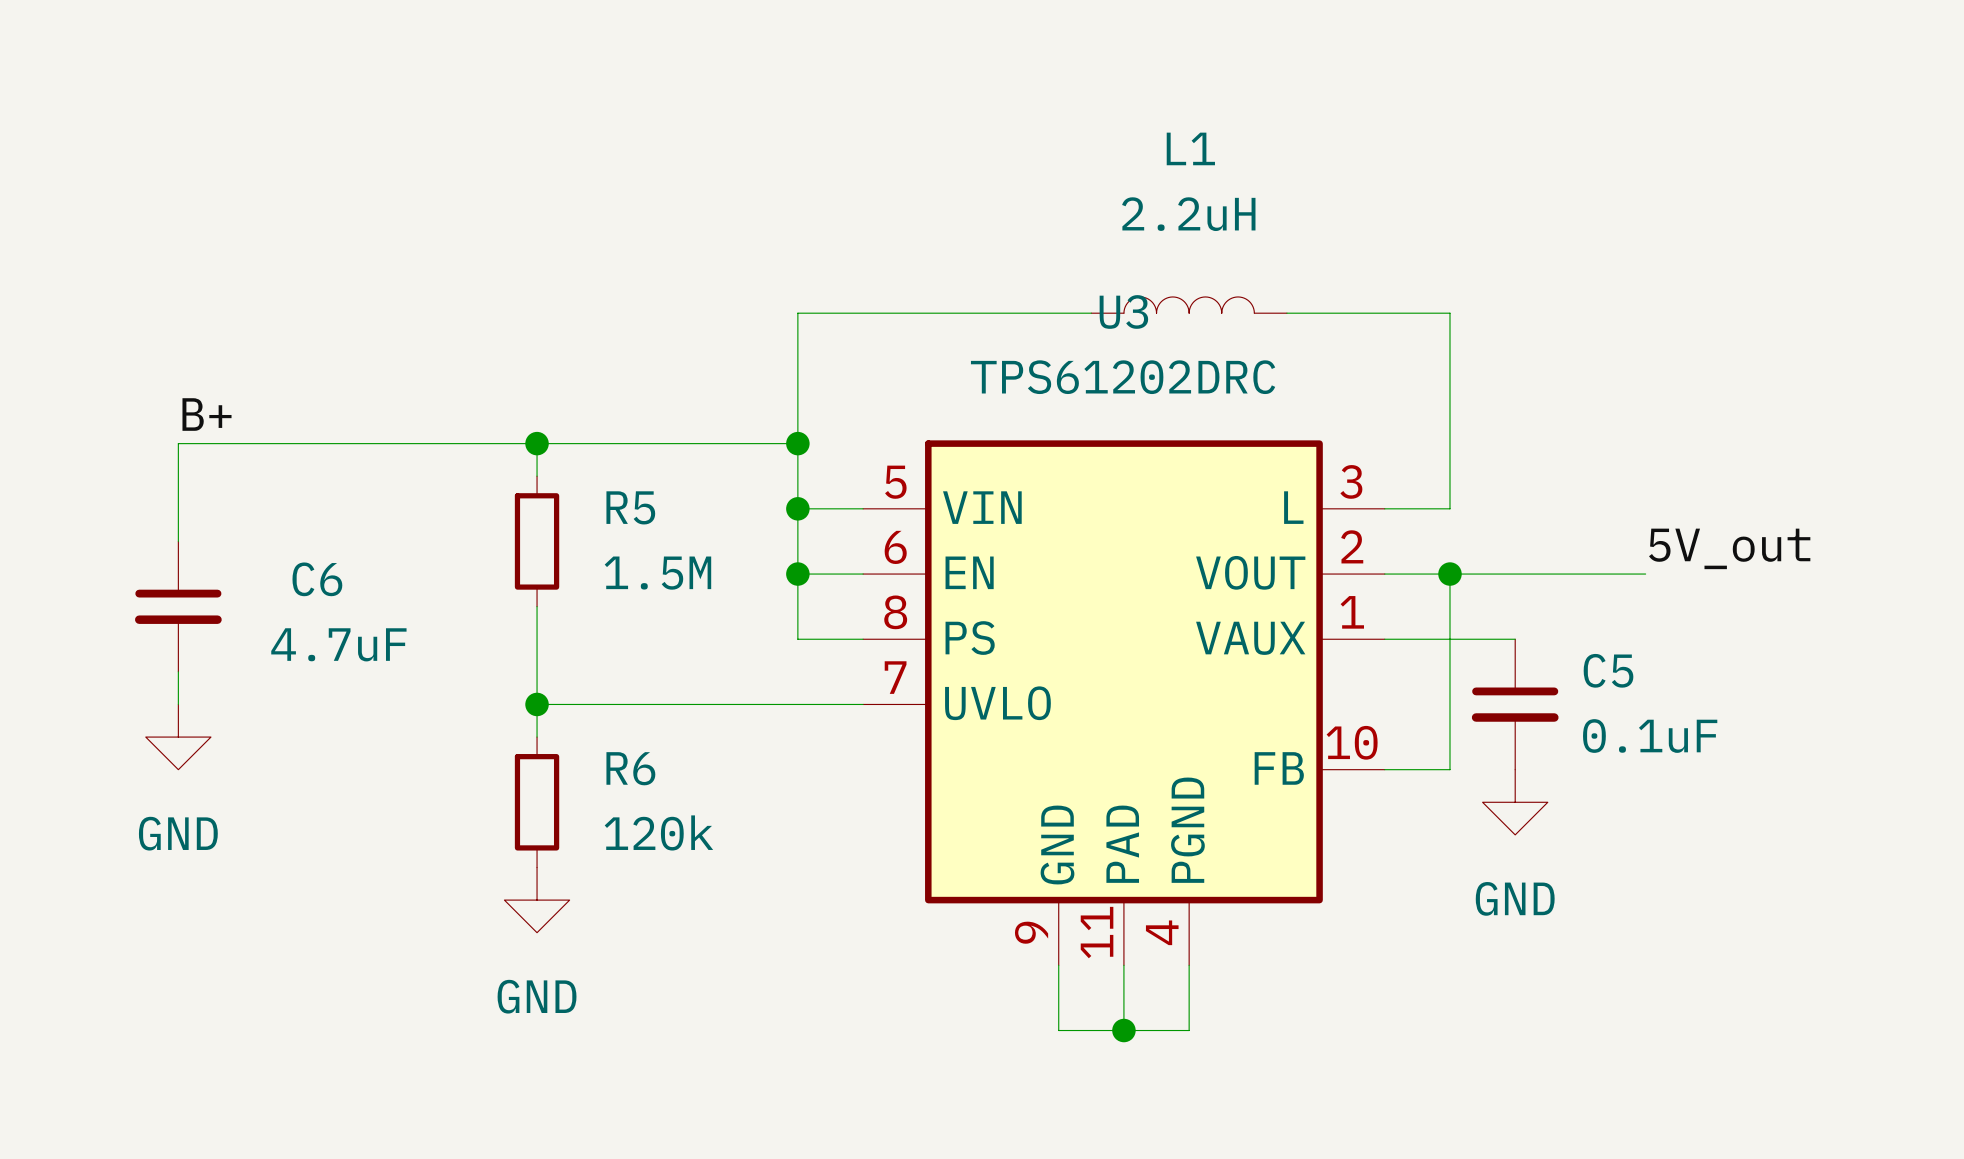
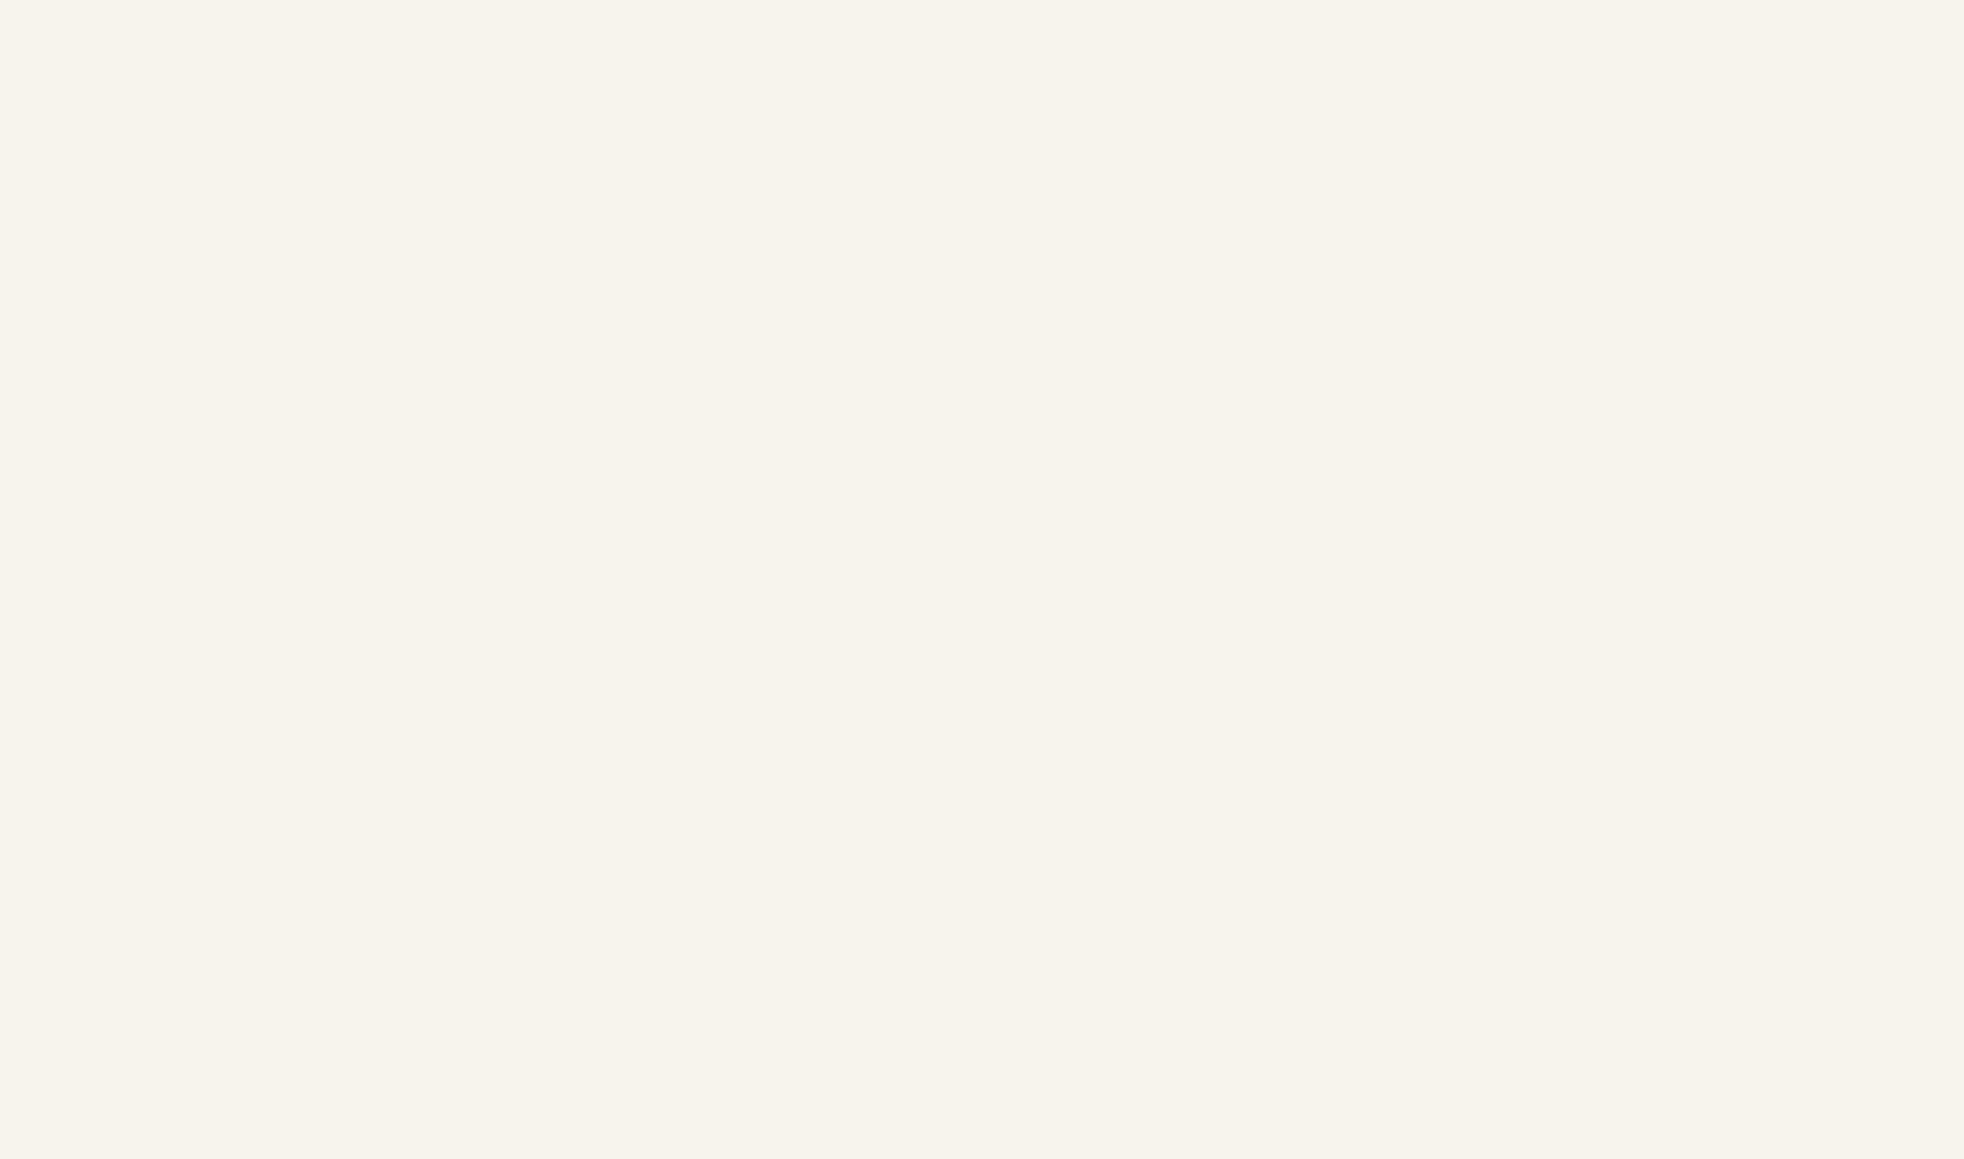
L1: 2.2uH (1189, 305) -> none
wire: (1091, 313) (797, 313) (797, 639) (863, 639) -> none
wire: (1286, 313) (1449, 313) (1449, 508) (1384, 508) -> none
label: B+ (207, 414) -> none
wire: (537, 443) (537, 476) -> none
junction: (537, 443) -> none
wire: (797, 443) (178, 443) (178, 541) -> none
junction: (797, 443) -> none
wire: (797, 508) (863, 508) -> none
junction: (797, 508) -> none
R5: 1.5M (537, 541) -> none
label: 5V_out (1729, 548) -> none
wire: (797, 574) (863, 574) -> none
junction: (797, 574) -> none
wire: (1384, 574) (1645, 574) -> none
wire: (1449, 574) (1449, 769) (1384, 769) -> none
junction: (1449, 574) -> none
C6: 4.7uF (178, 606) -> none
wire: (537, 606) (537, 737) -> none
wire: (1384, 639) (1515, 639) -> none
wire: (178, 671) (178, 704) -> none
U3: TPS61202DRC (1123, 702) -> none
wire: (537, 704) (863, 704) -> none
junction: (537, 704) -> none
C5: 0.1uF (1515, 704) -> none
power symbol: GND (178, 737) -> none
R6: 120k (537, 802) -> none
power symbol: GND (1515, 802) -> none
power symbol: GND (537, 900) -> none
wire: (1058, 965) (1058, 1030) (1189, 1030) (1189, 965) -> none
wire: (1123, 965) (1123, 1030) -> none
junction: (1123, 1030) -> none

